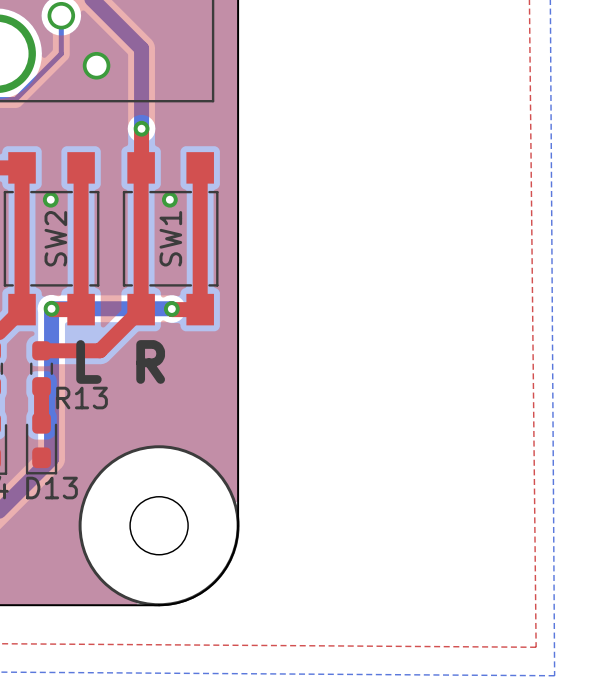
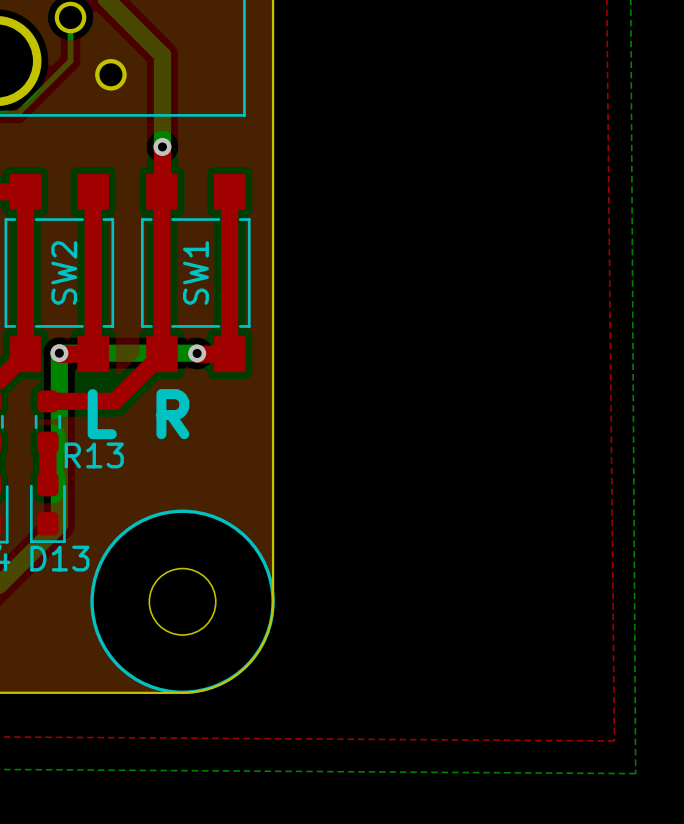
via: (50, 199) -> none
via: (169, 199) -> none

